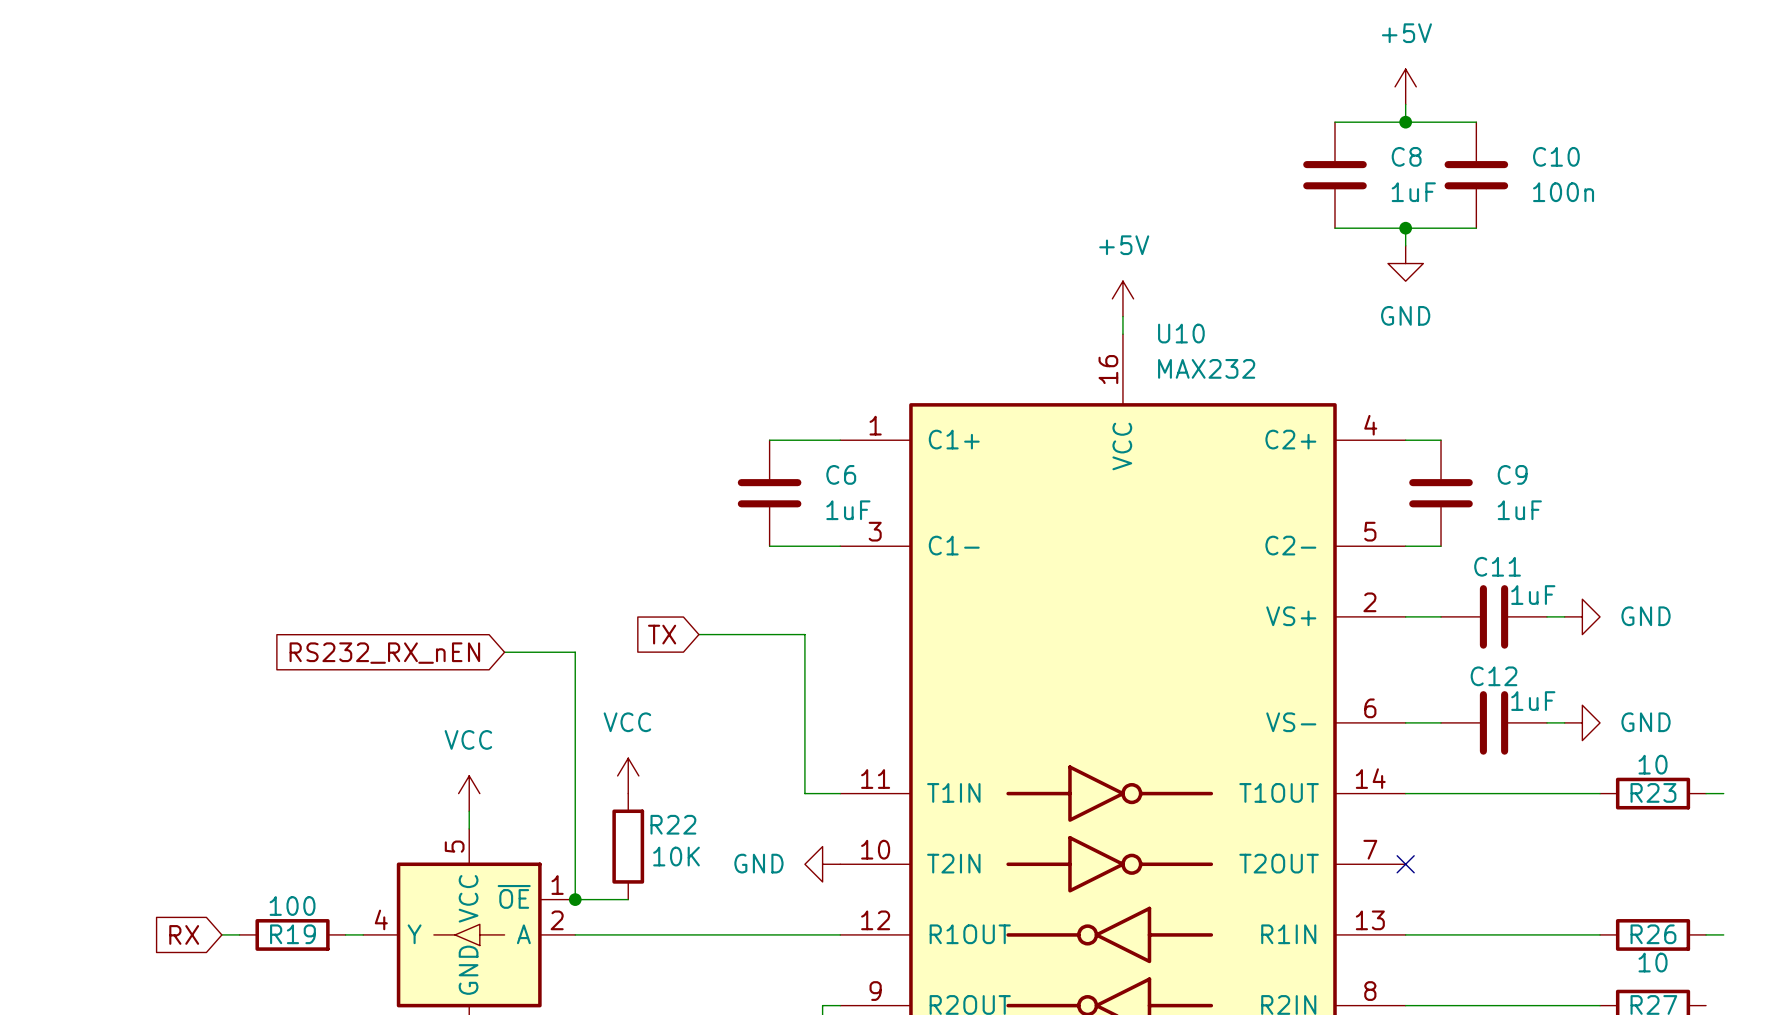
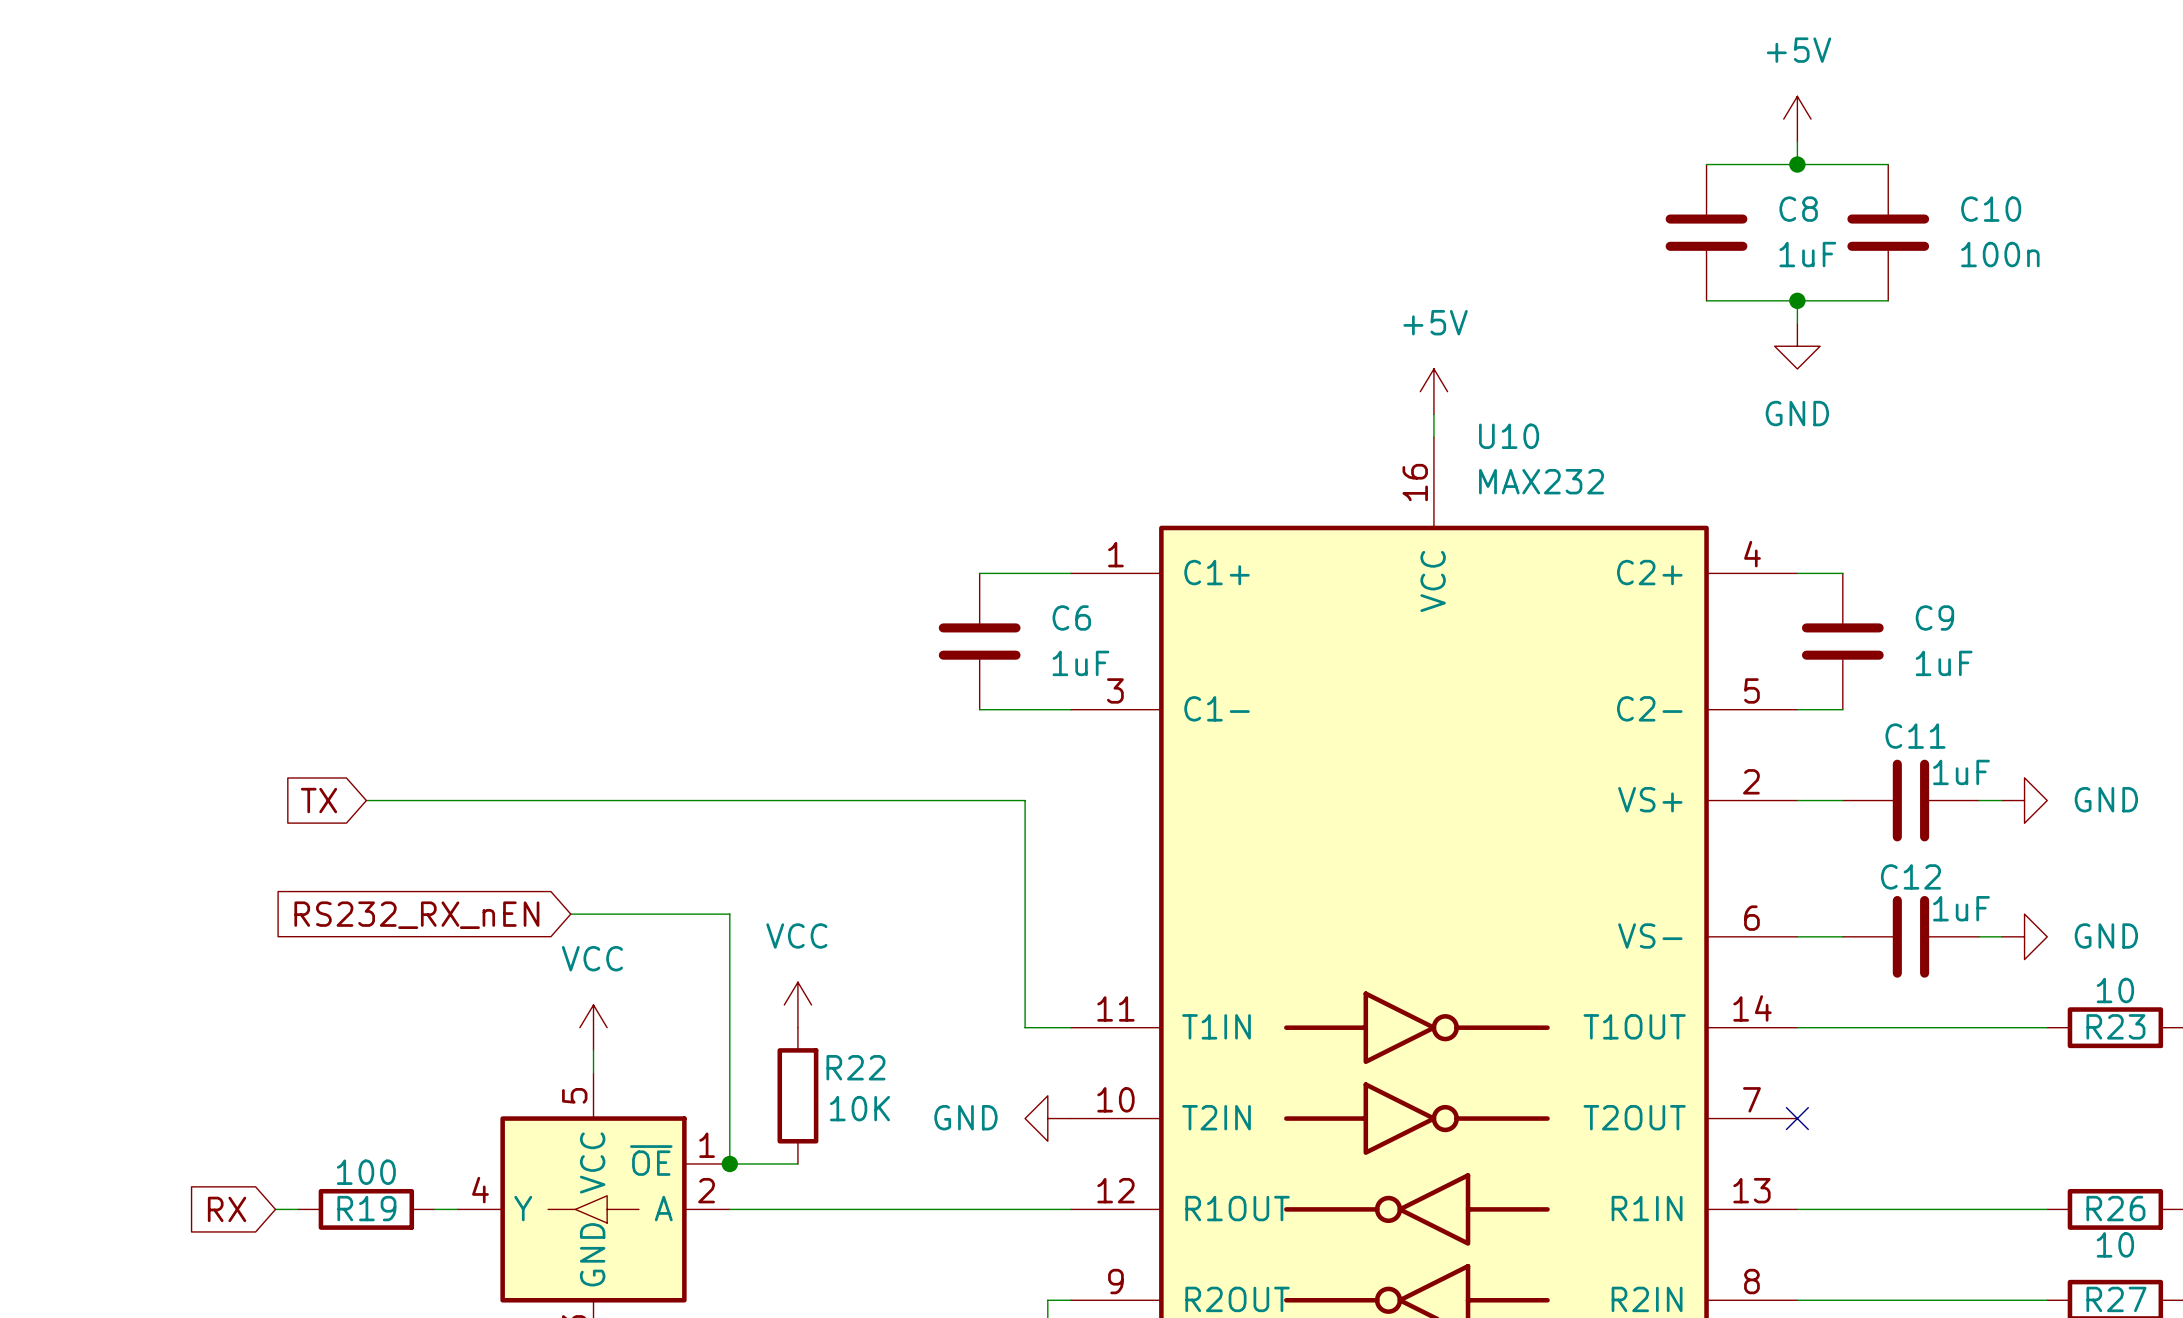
global label: none -> TX (319, 800)
global label: TX (662, 634) -> none
wire: (698, 634) (804, 634) -> (366, 800) (1025, 800) (1025, 823)
wire: (504, 652) (575, 652) (575, 705) -> (570, 914) (729, 914)
global label position: RS232_RX_nEN (384, 653) -> RS232_RX_nEN (416, 915)

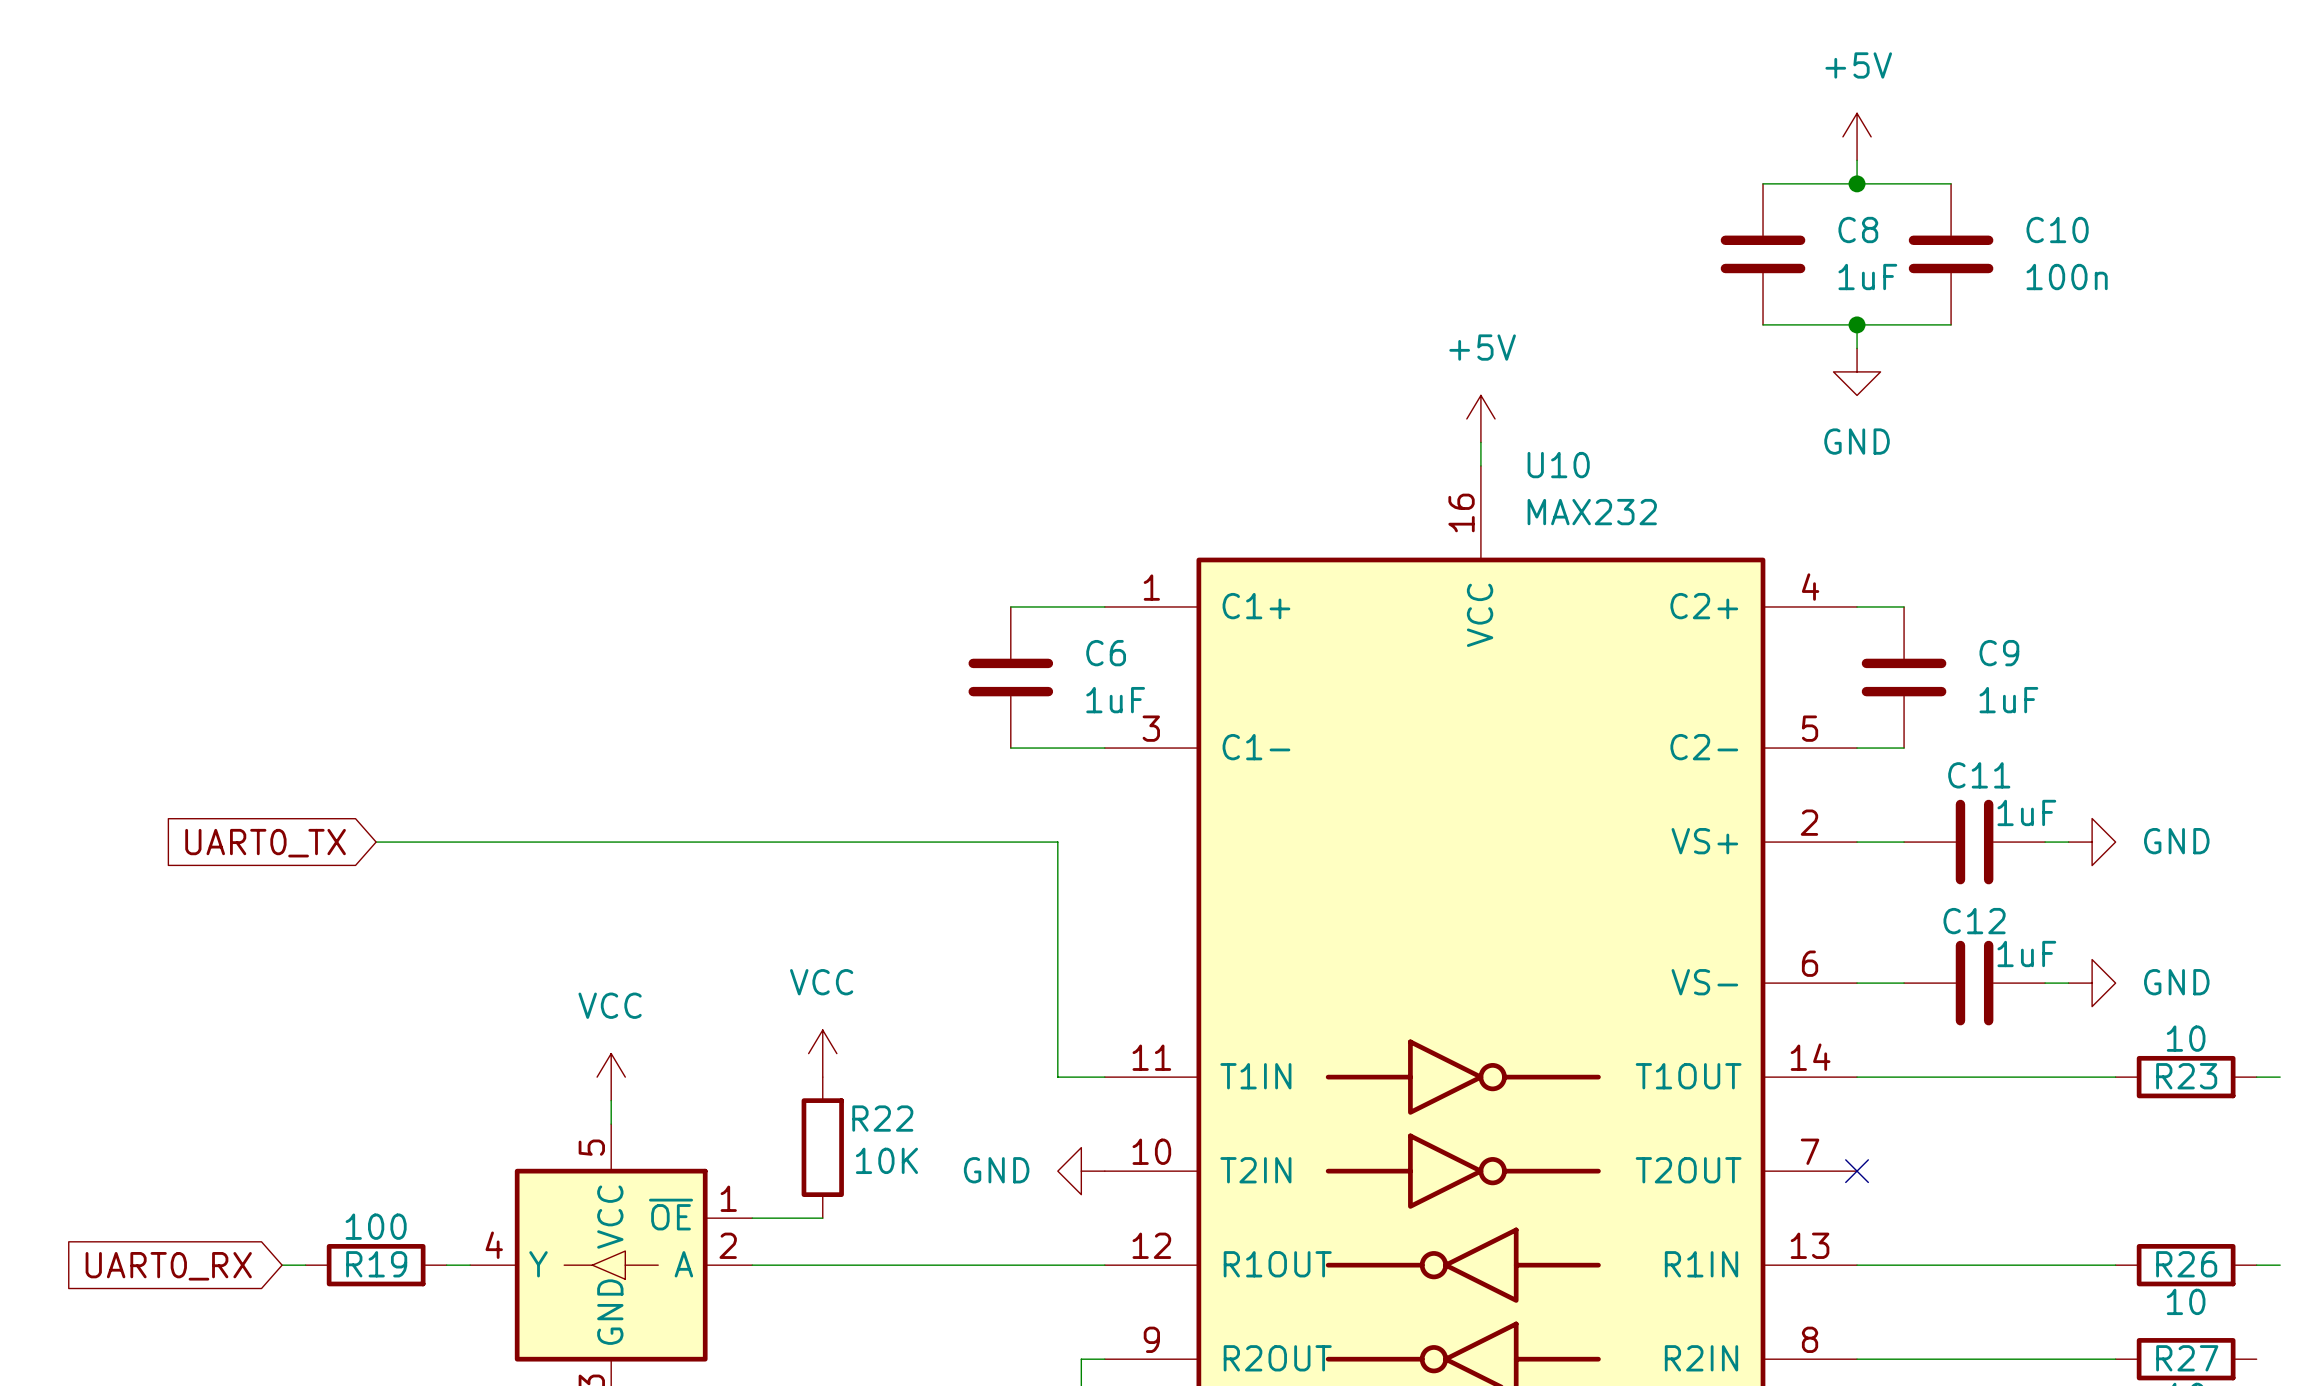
global label: TX (319, 800) -> UART0_TX (265, 843)
wire: (570, 914) (729, 914) (729, 1163) -> none
global label: RS232_RX_nEN (416, 915) -> none
junction: (729, 1163) -> none
global label: RX (227, 1209) -> UART0_RX (168, 1266)

